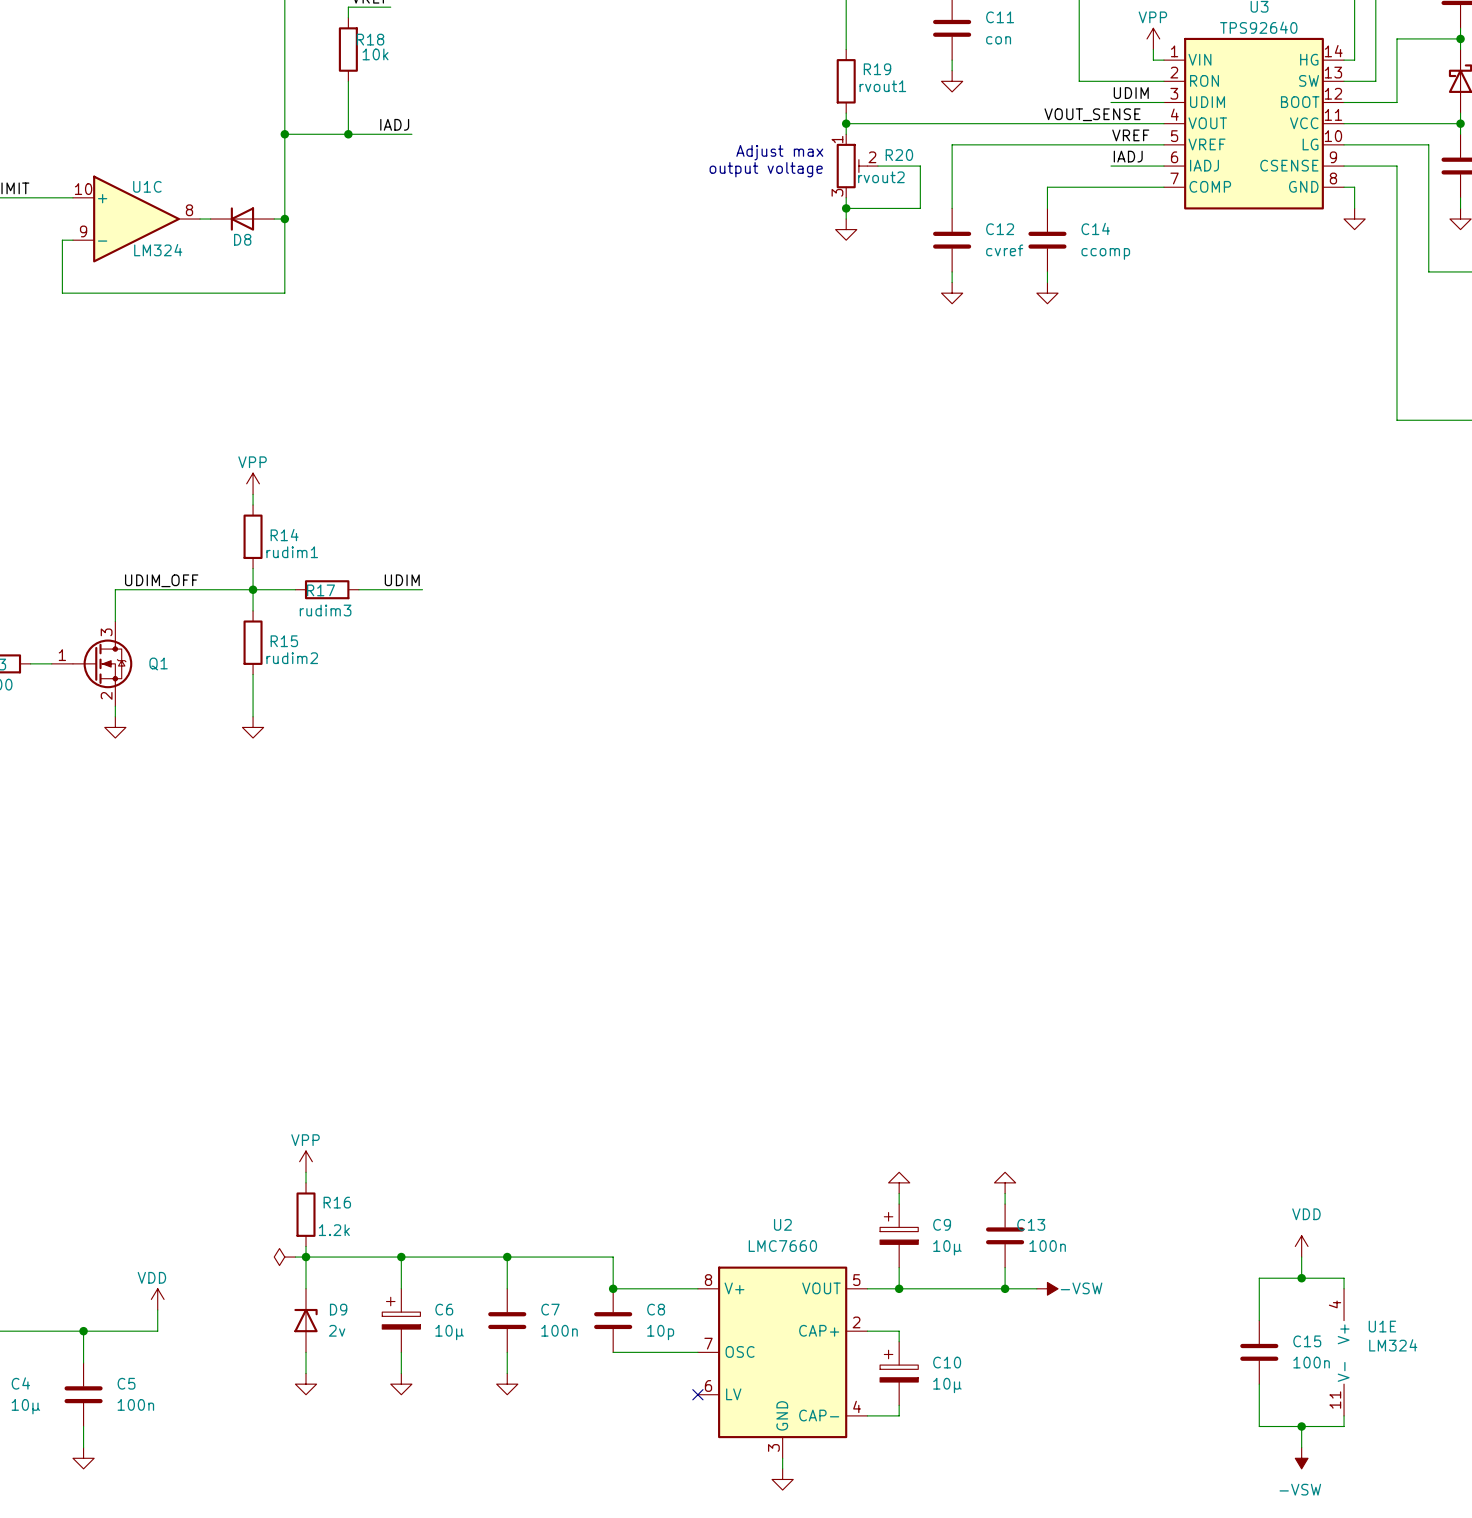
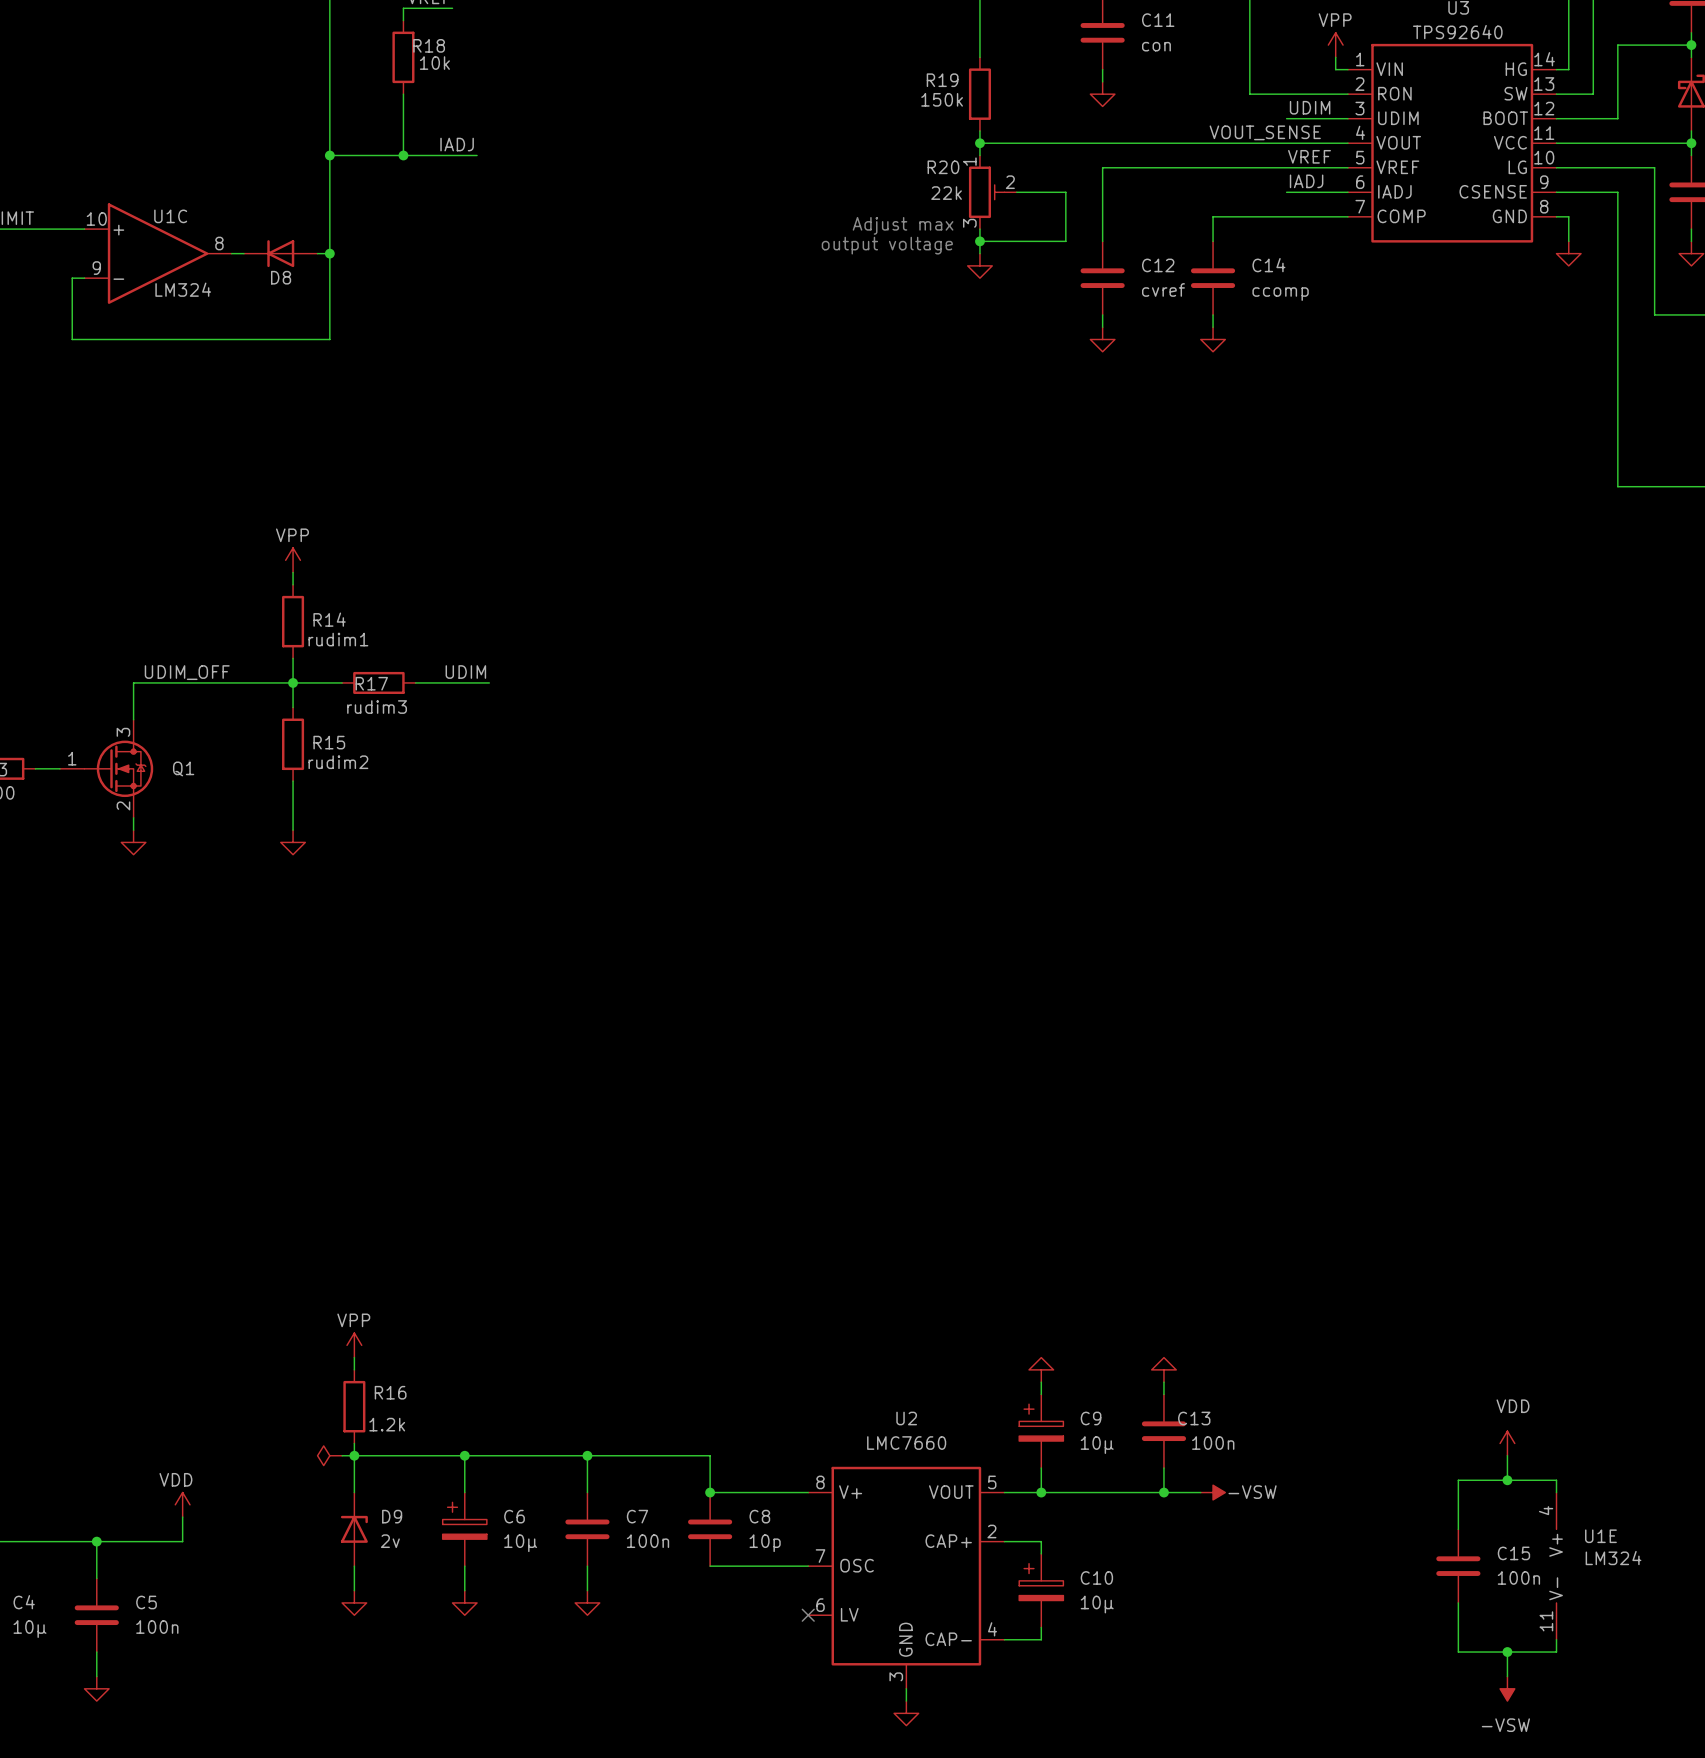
R19 name position: R19 (877, 69) -> R19 (942, 80)
R19 value: rvout1 (882, 86) -> 150k (942, 99)
text position: Adjust max (779, 152) -> Adjust max (903, 225)
R20 name position: R20 (899, 155) -> R20 (943, 167)
text position: output voltage (766, 169) -> output voltage (887, 245)
R20 value: rvout2 (881, 177) -> 22k (946, 193)

